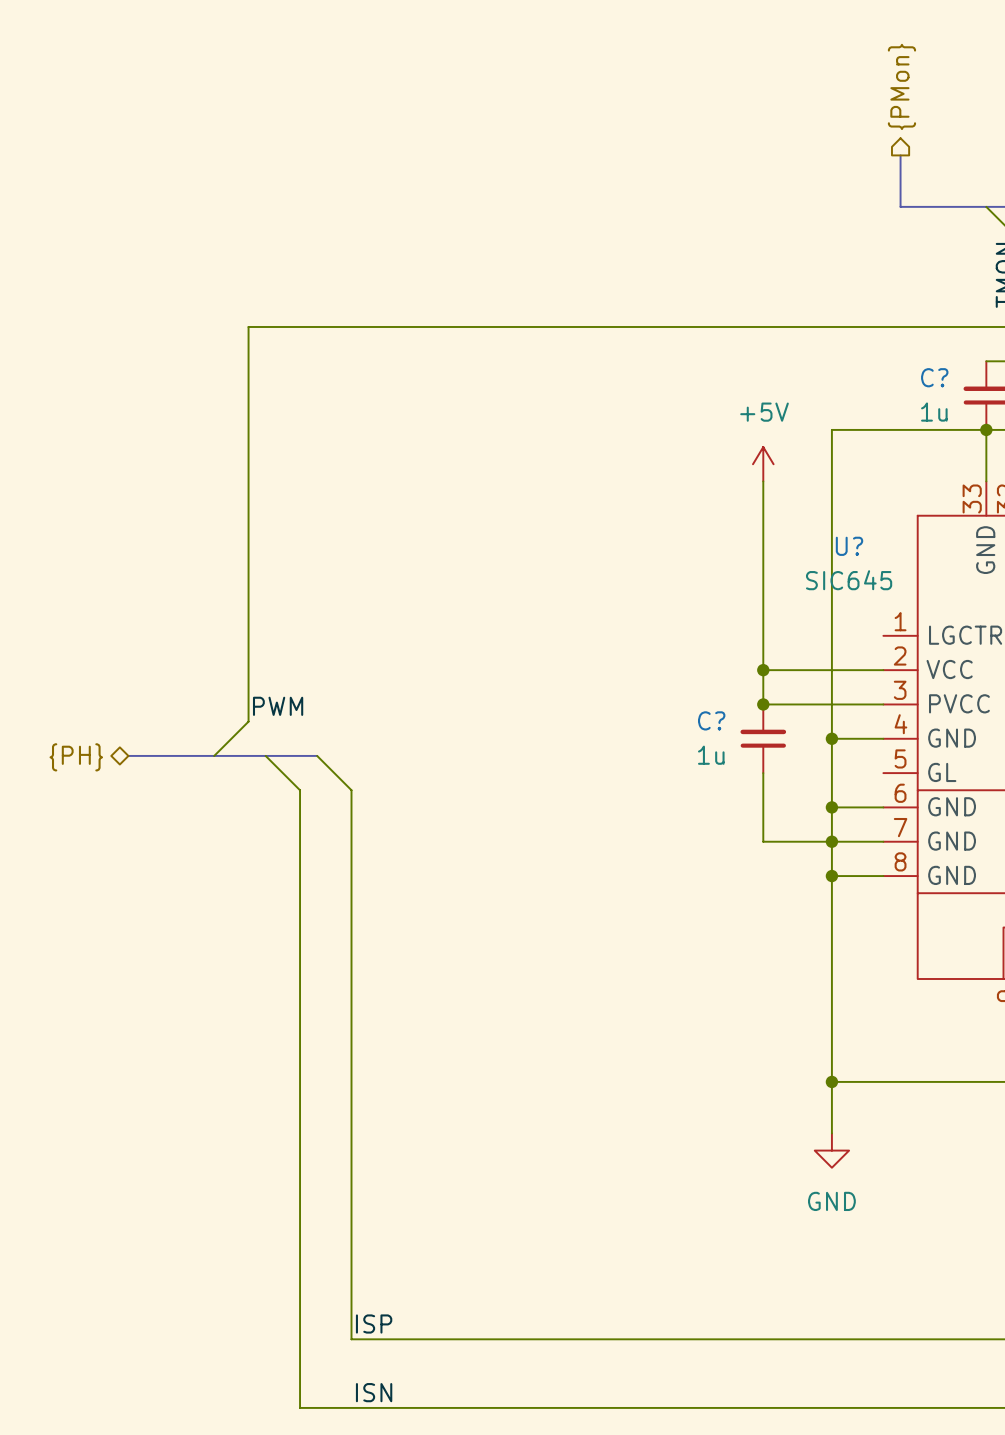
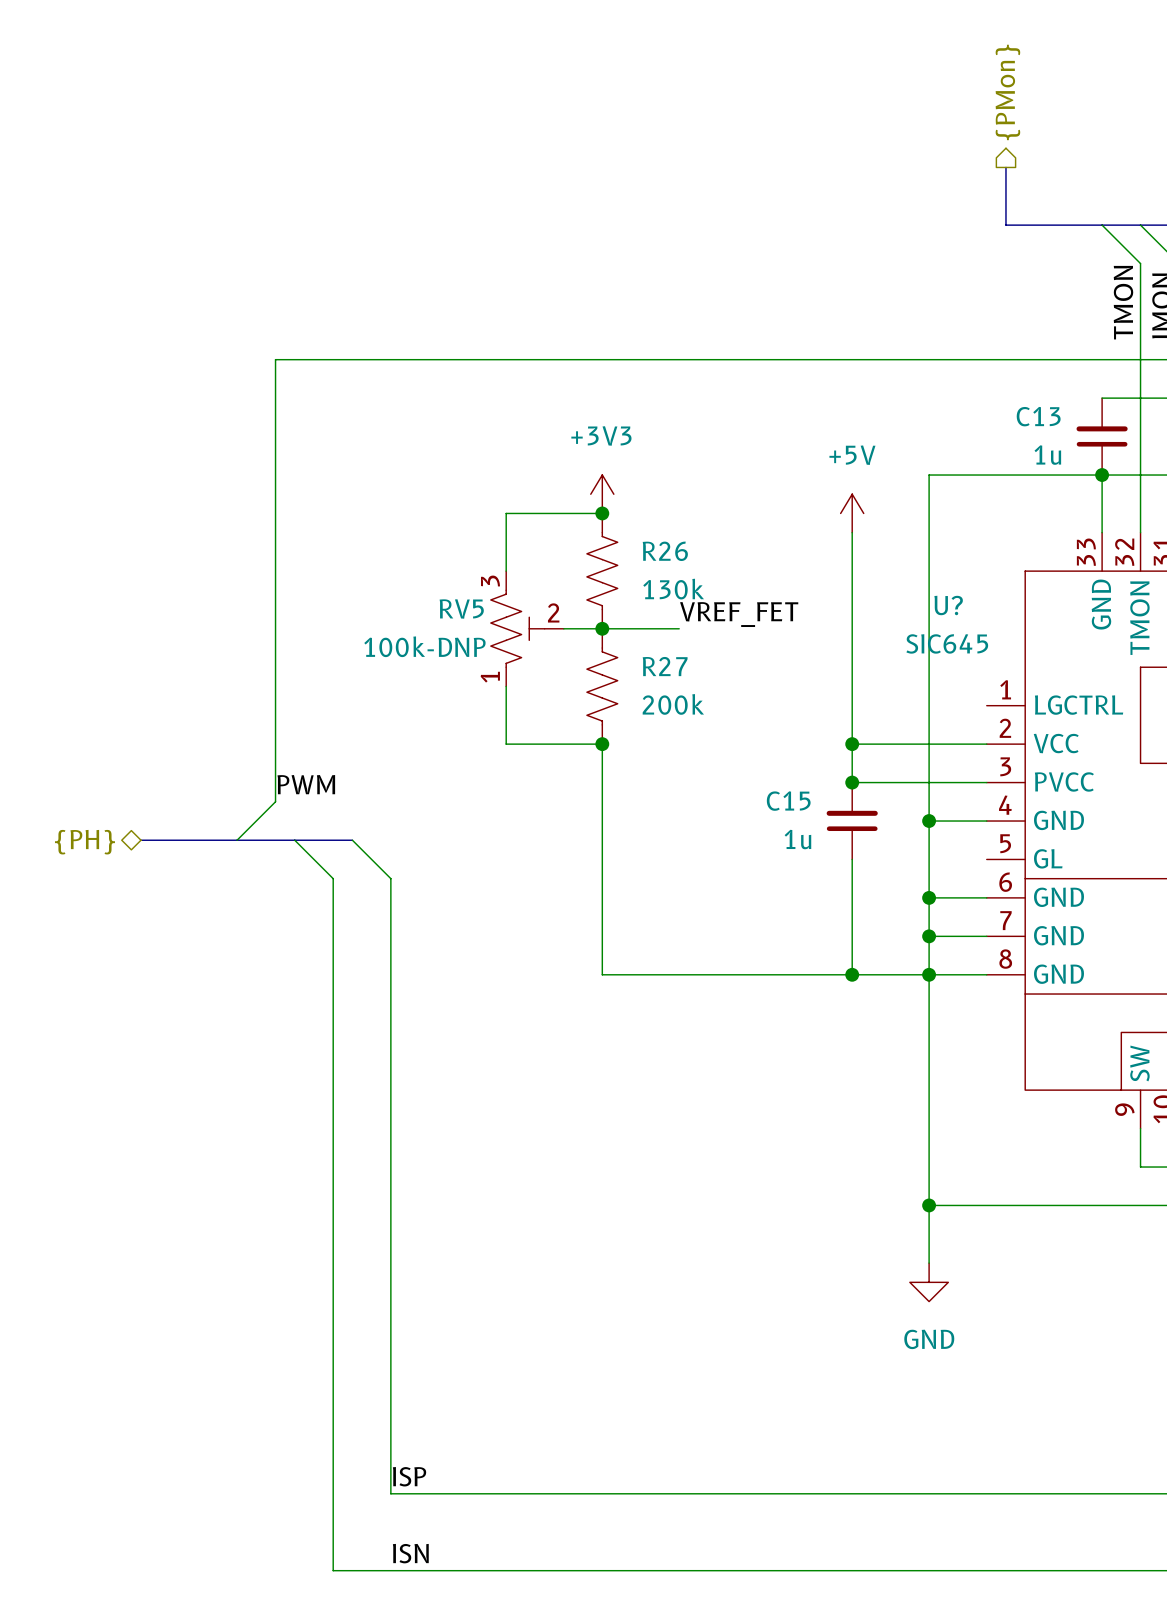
C? name: C? (934, 377) -> C13 (1038, 416)
power symbol: none -> +3V3 (602, 494)
wire: none -> (602, 513) (506, 513) (506, 571)
junction: none -> (602, 513)
R26: none -> 130k (602, 571)
label: none -> VREF_FET (739, 614)
RV5: none -> 100k-DNP (527, 628)
wire: none -> (563, 628) (679, 628)
junction: none -> (602, 628)
wire: none -> (506, 686) (506, 744) (602, 744) (602, 974) (929, 974)
R27: none -> 200k (602, 686)
junction: none -> (602, 744)
C? name: C? (711, 720) -> C15 (788, 801)
wire: (763, 841) (831, 841) -> (852, 936) (852, 974)
junction: none -> (852, 974)

